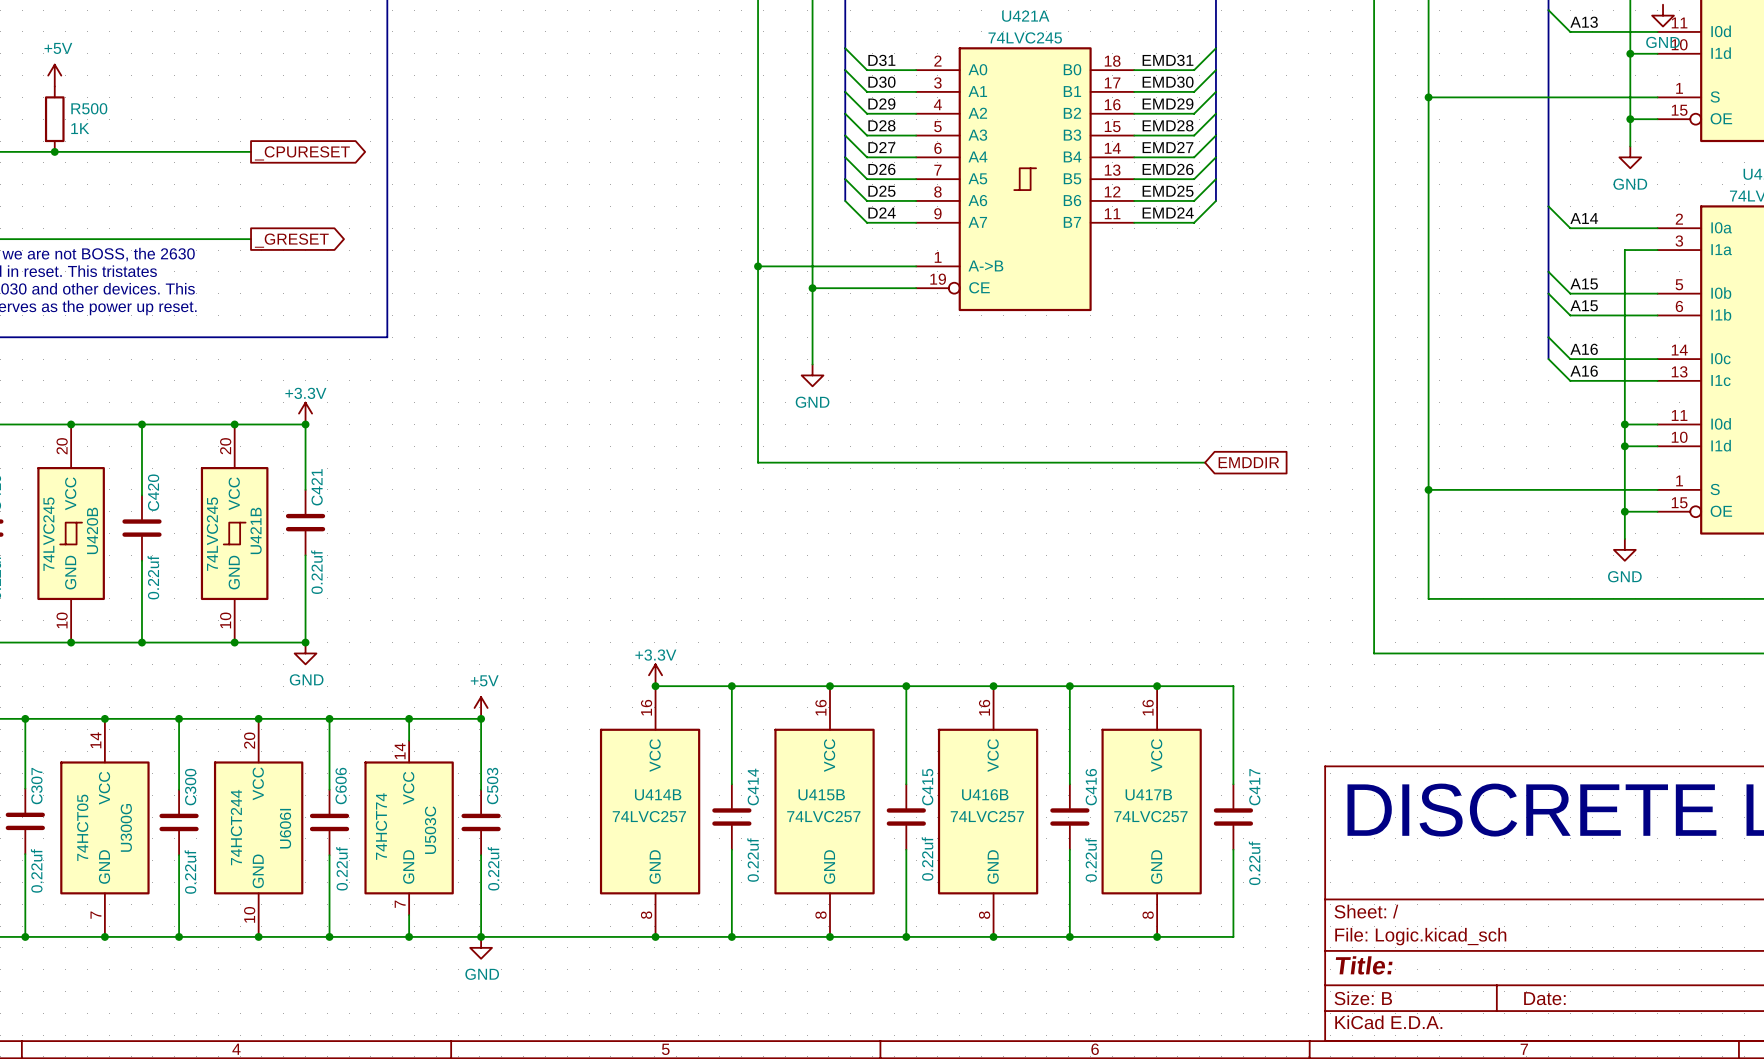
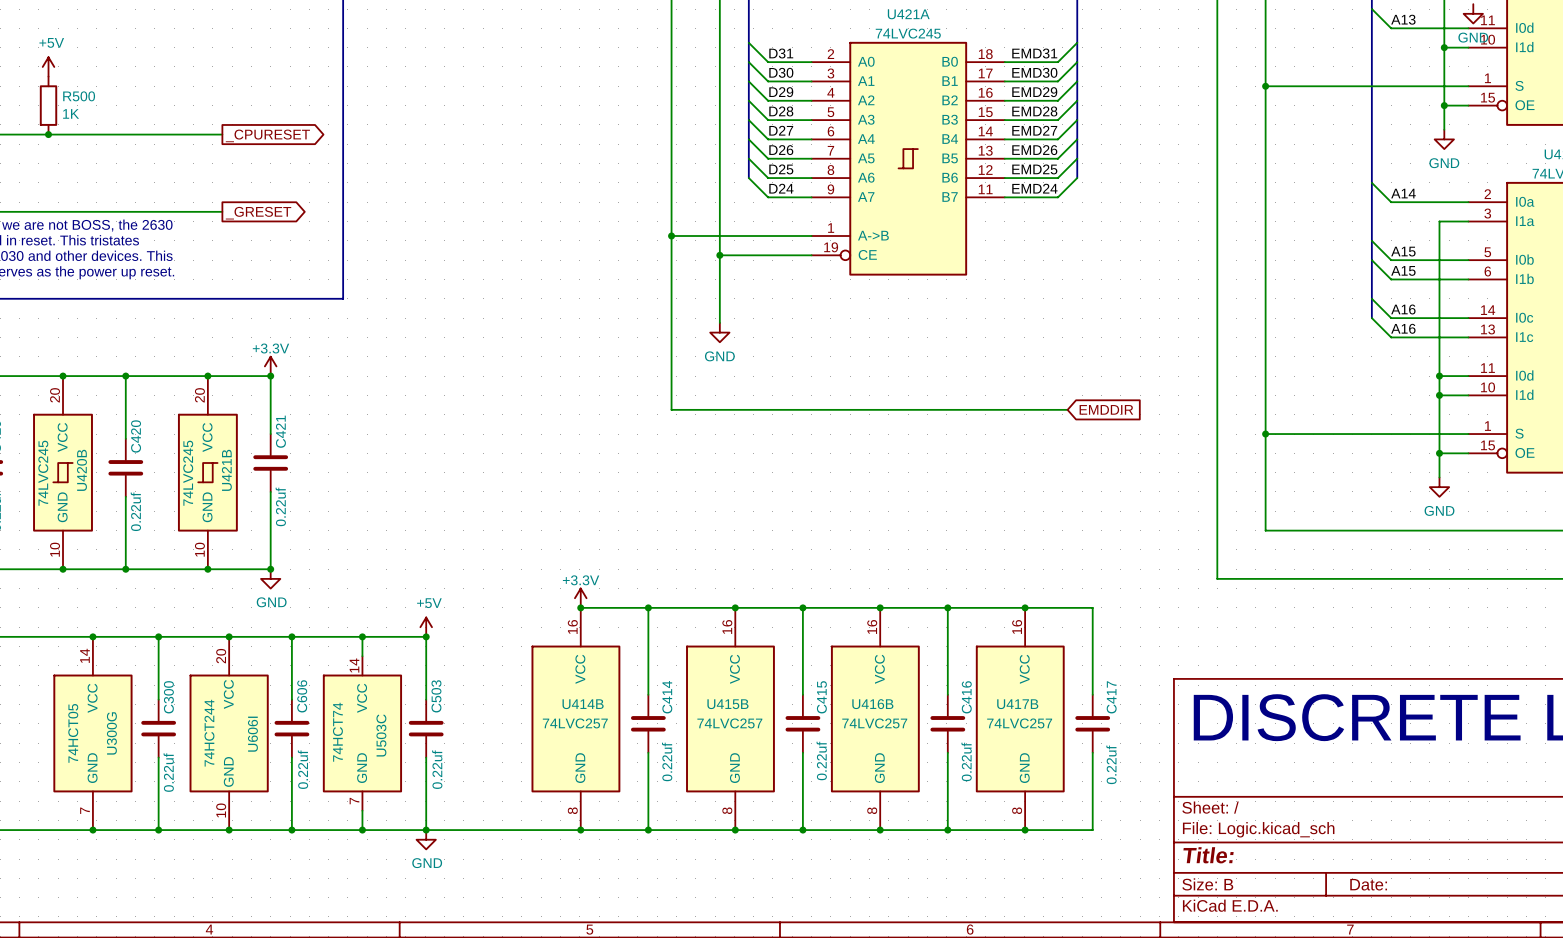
wire: (25, 718) (25, 788) -> none
junction: (25, 718) -> none
C307: 0.22uf (25, 821) -> none
wire: (25, 854) (25, 936) -> none
junction: (25, 936) -> none

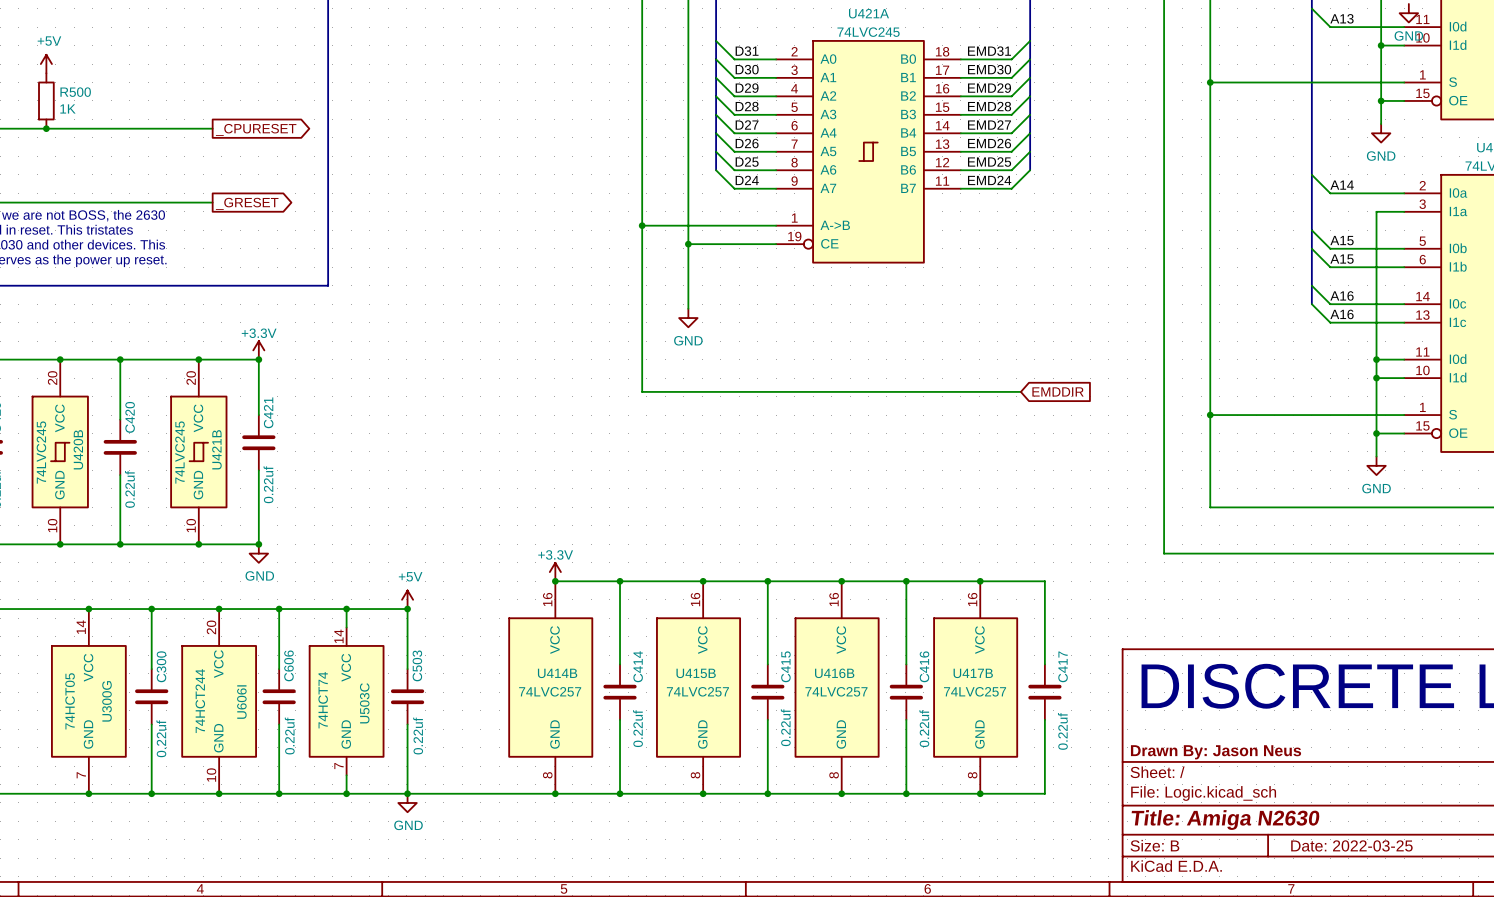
title block: none -> Drawn By: Jason Neus (1216, 752)
title block: Title: (1208, 855) -> Title: Amiga N2630 (1225, 820)
title block: Date: (1368, 884) -> Date: 2022-03-25 (1351, 845)

